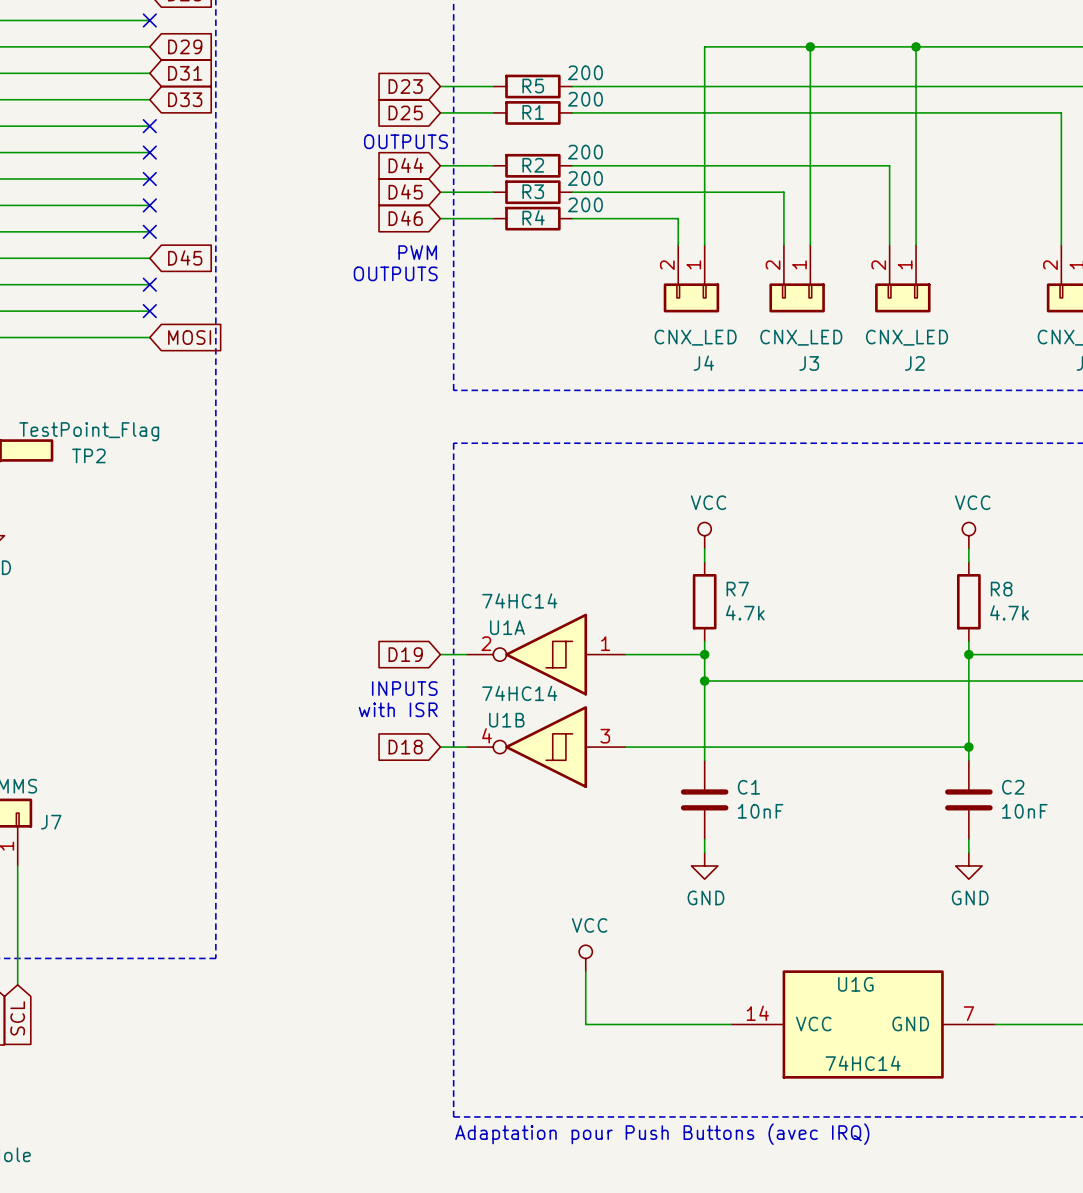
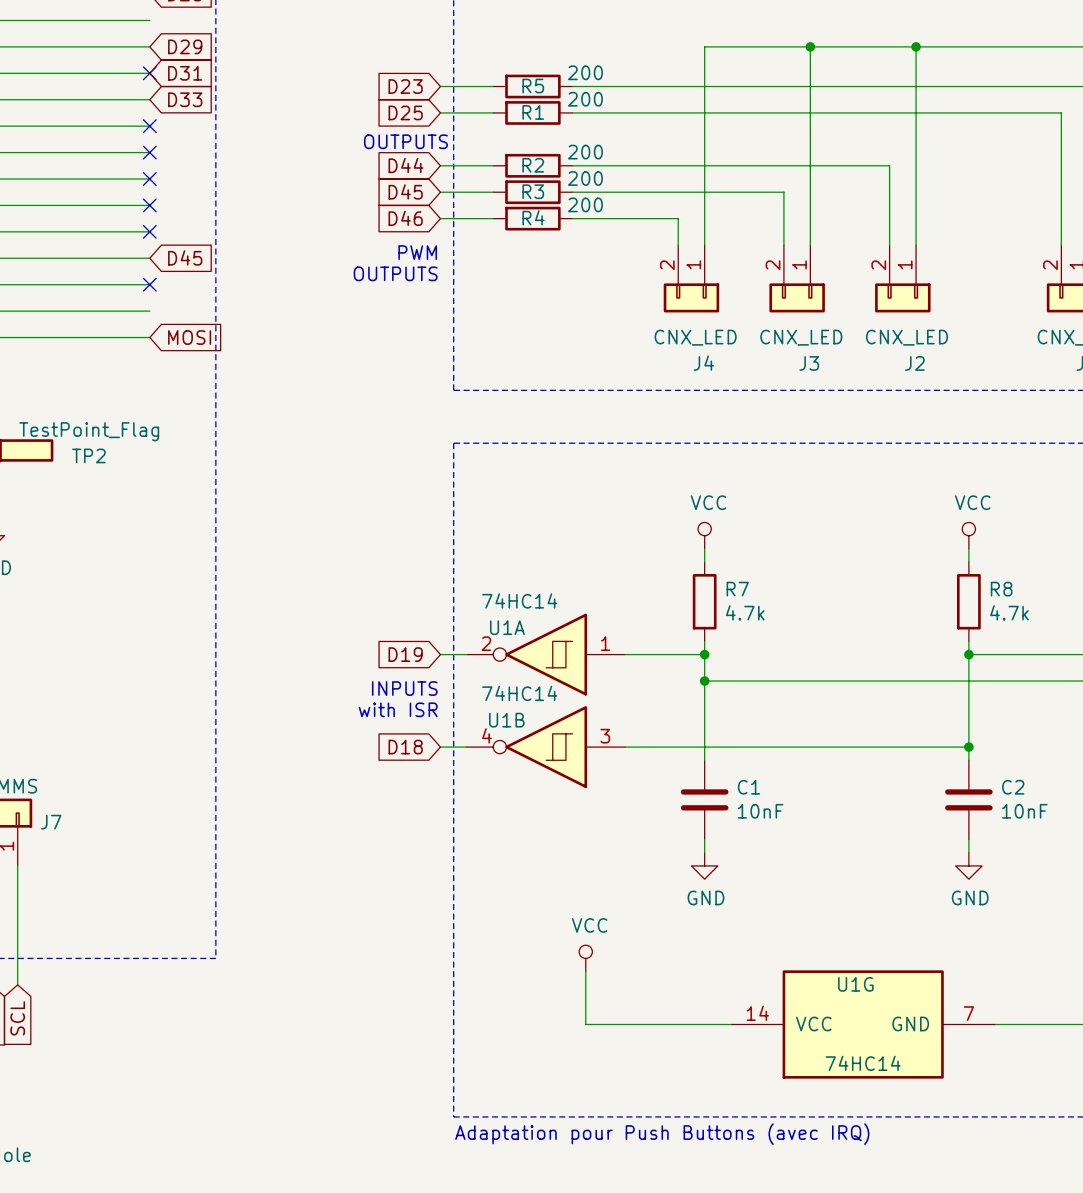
no-connect mark position: (149, 20) -> (149, 73)
no-connect mark: (149, 311) -> none

